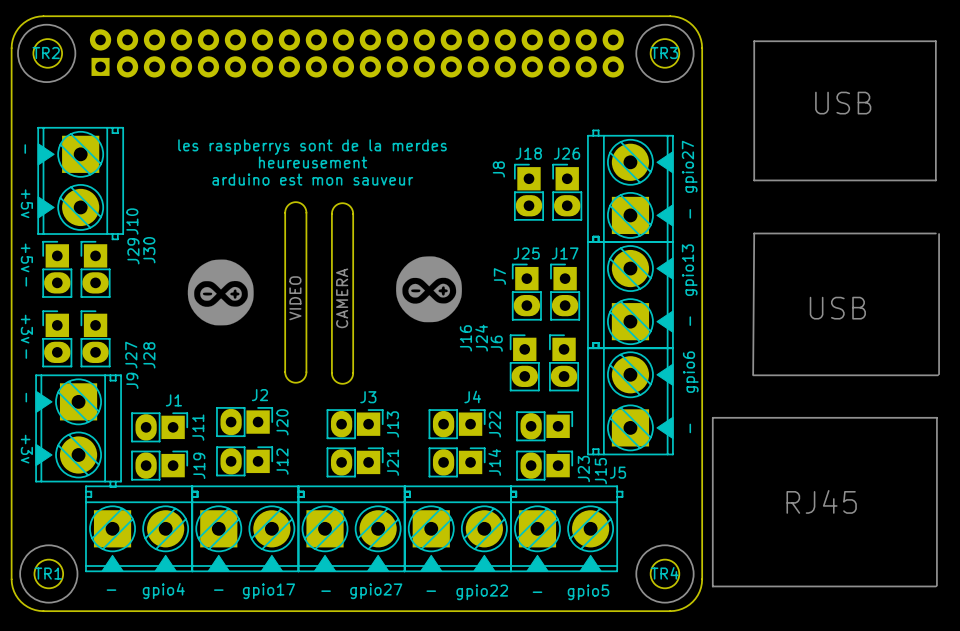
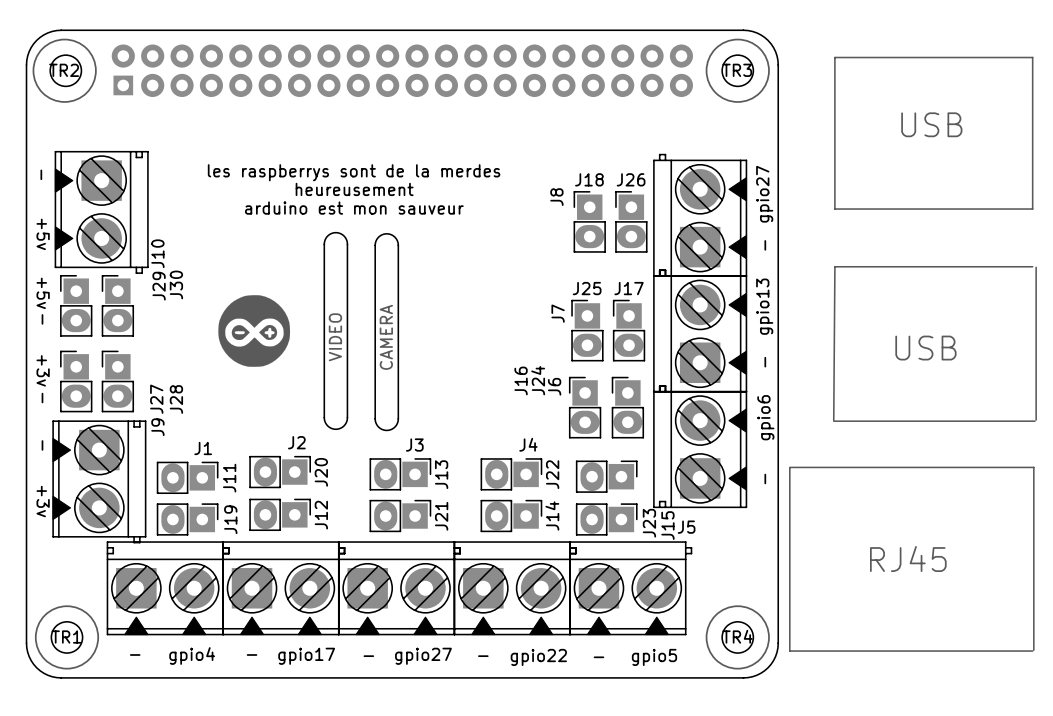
drawing: [396, 256, 462, 323] -> none

